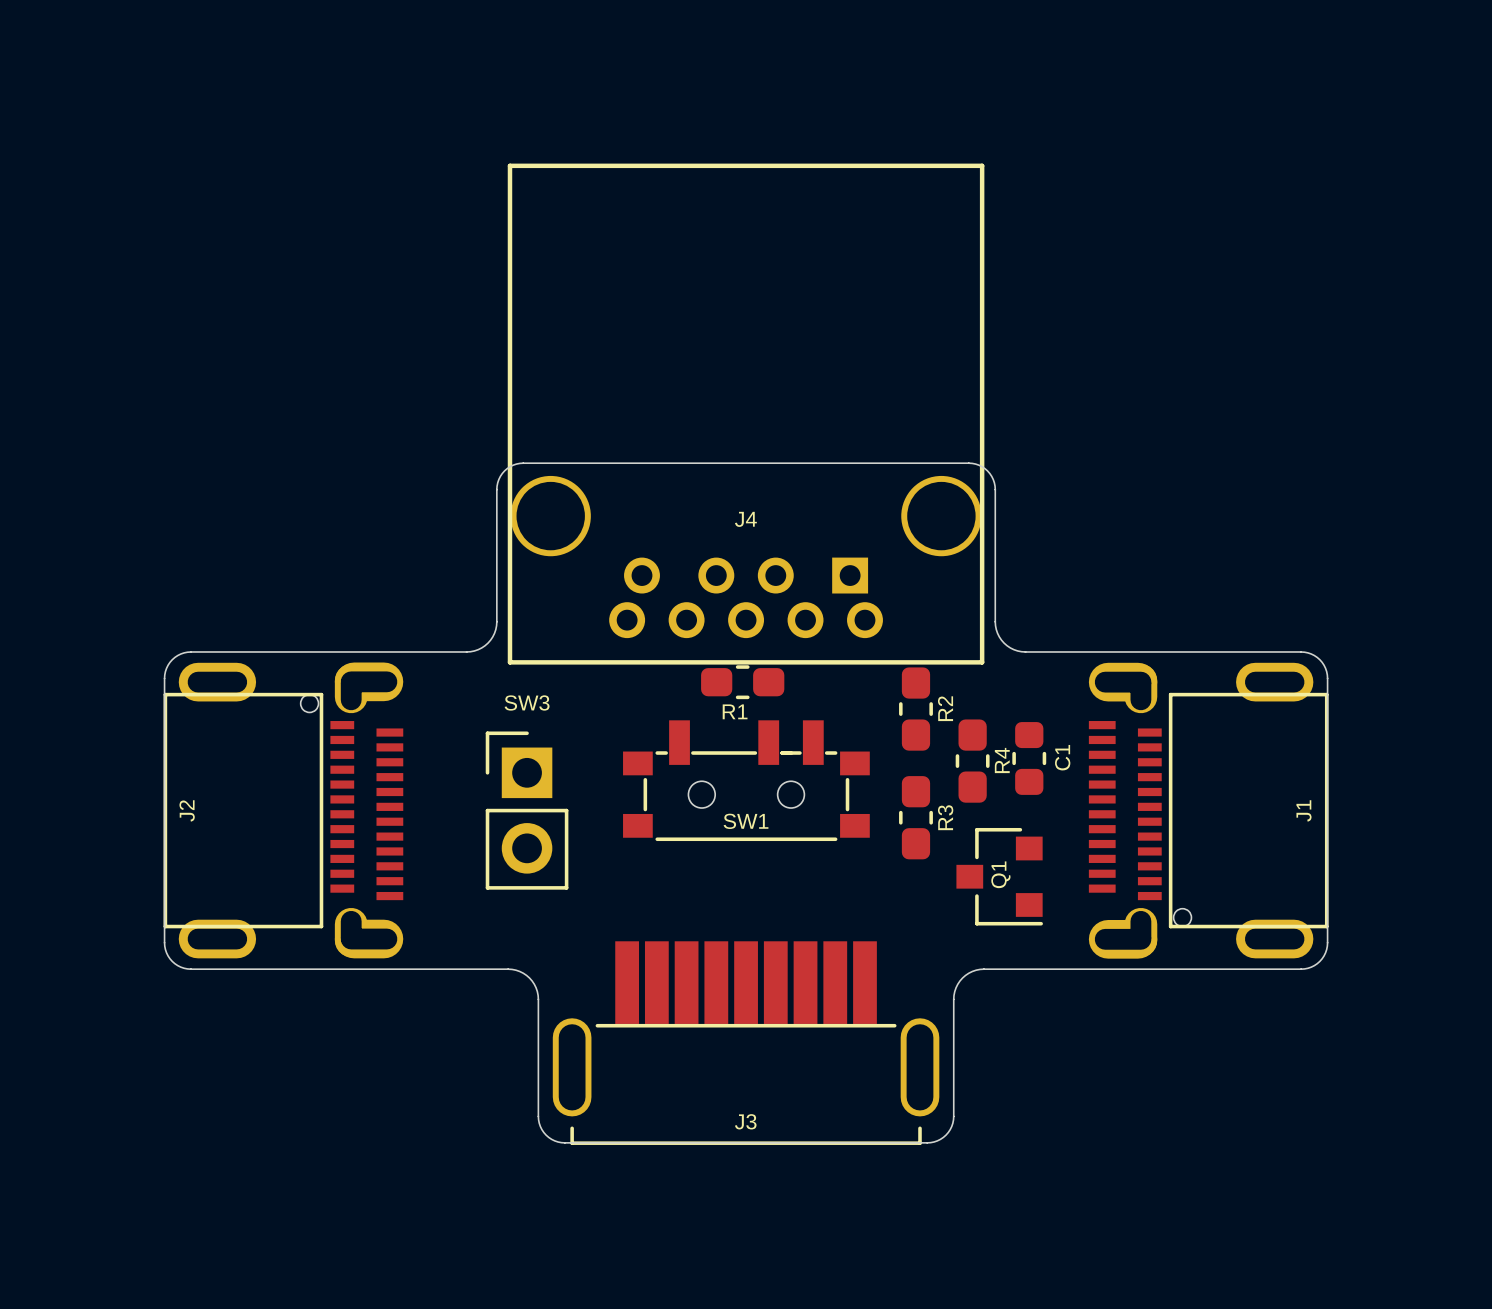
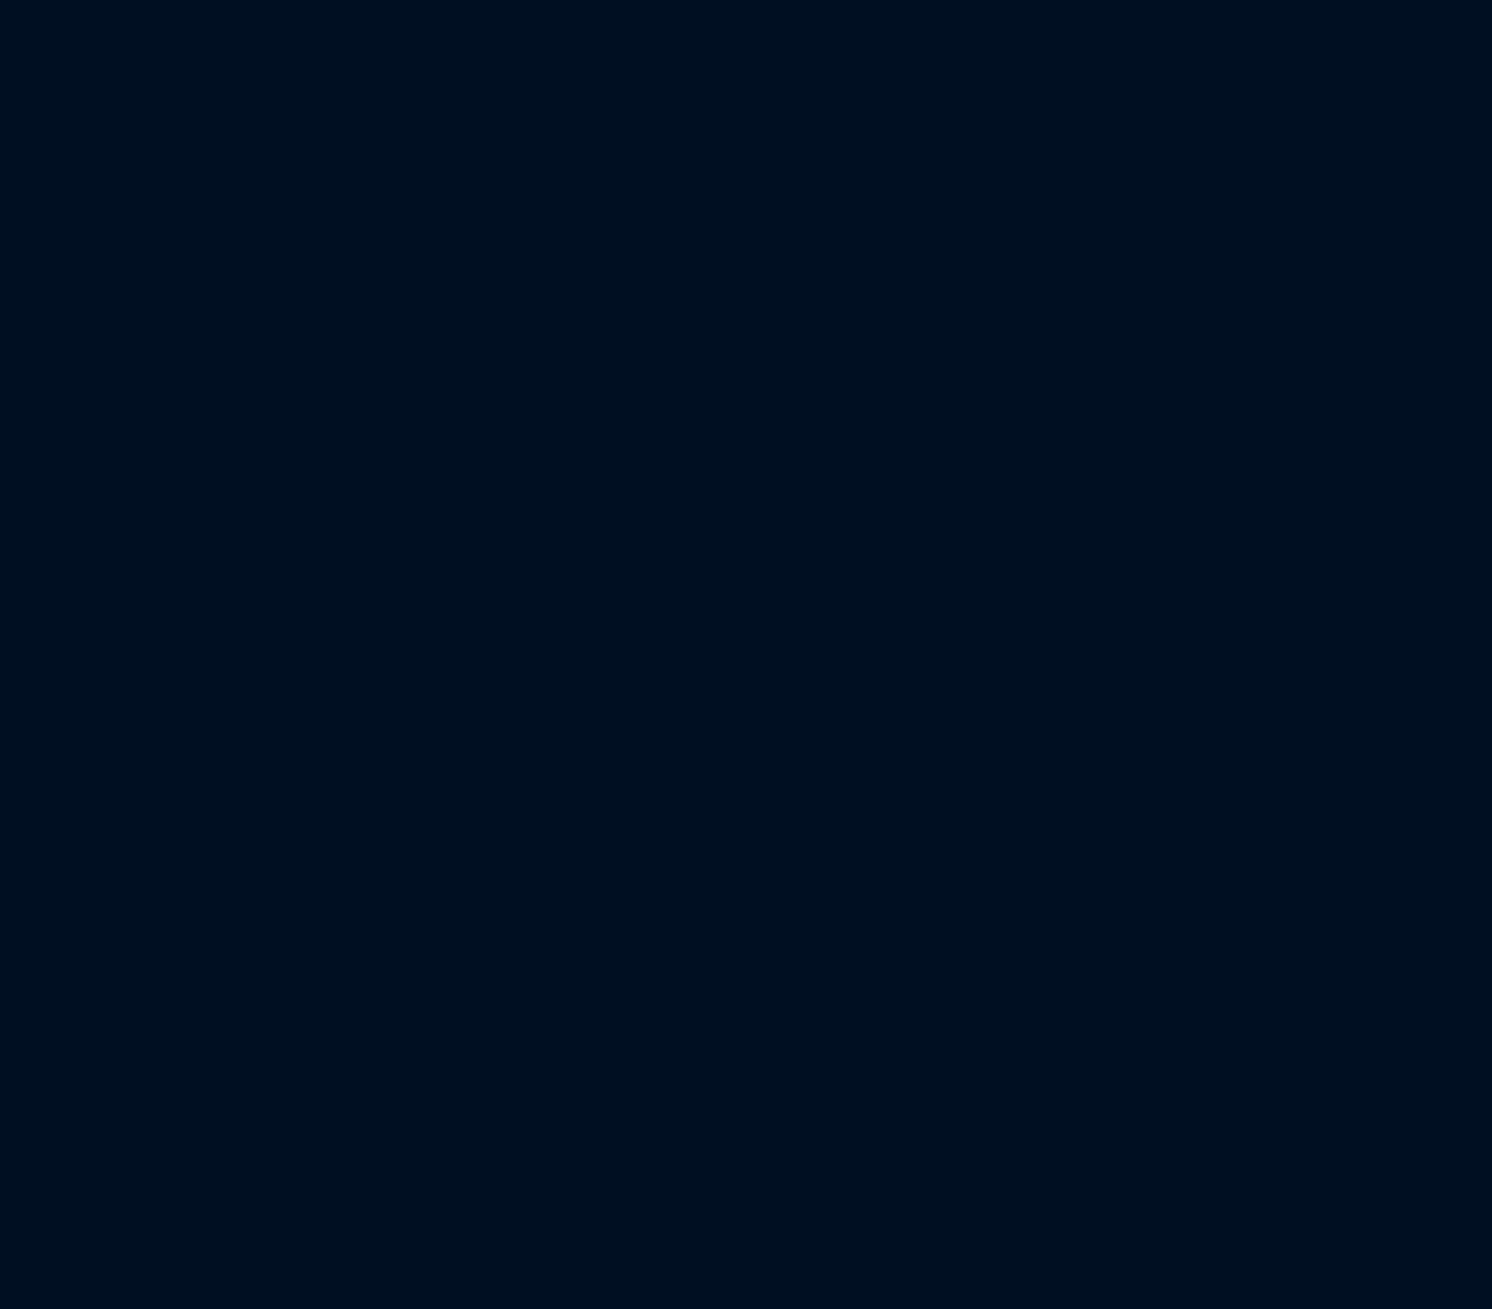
J4: (746, 414) -> none
R1: (742, 682) -> none
R2: (915, 709) -> none
C1: (1029, 758) -> none
R4: (972, 761) -> none
SW1: (746, 780) -> none
J2: (283, 810) -> none
SW3: (527, 810) -> none
J1: (1208, 810) -> none
R3: (915, 817) -> none
Q1: (999, 876) -> none
J3: (746, 1043) -> none
board edge: (953, 1116) (954, 995) (959, 980) (972, 971) (983, 969) (1301, 969) (1314, 965) (1322, 958) (1327, 942) (1327, 678) (1325, 668) (1317, 657) (1301, 651) (1025, 651) (1010, 647) (999, 636) (995, 625) (995, 486) (987, 470) (975, 464) (523, 463) (507, 468) (497, 482) (496, 625) (492, 636) (481, 647) (466, 651) (190, 651) (177, 655) (168, 665) (164, 678) (164, 942) (168, 955) (177, 965) (190, 969) (508, 969) (519, 971) (532, 980) (538, 995) (539, 1123) (548, 1137) (561, 1142) (930, 1142) (946, 1135) (951, 1126) (953, 1116) -> none

